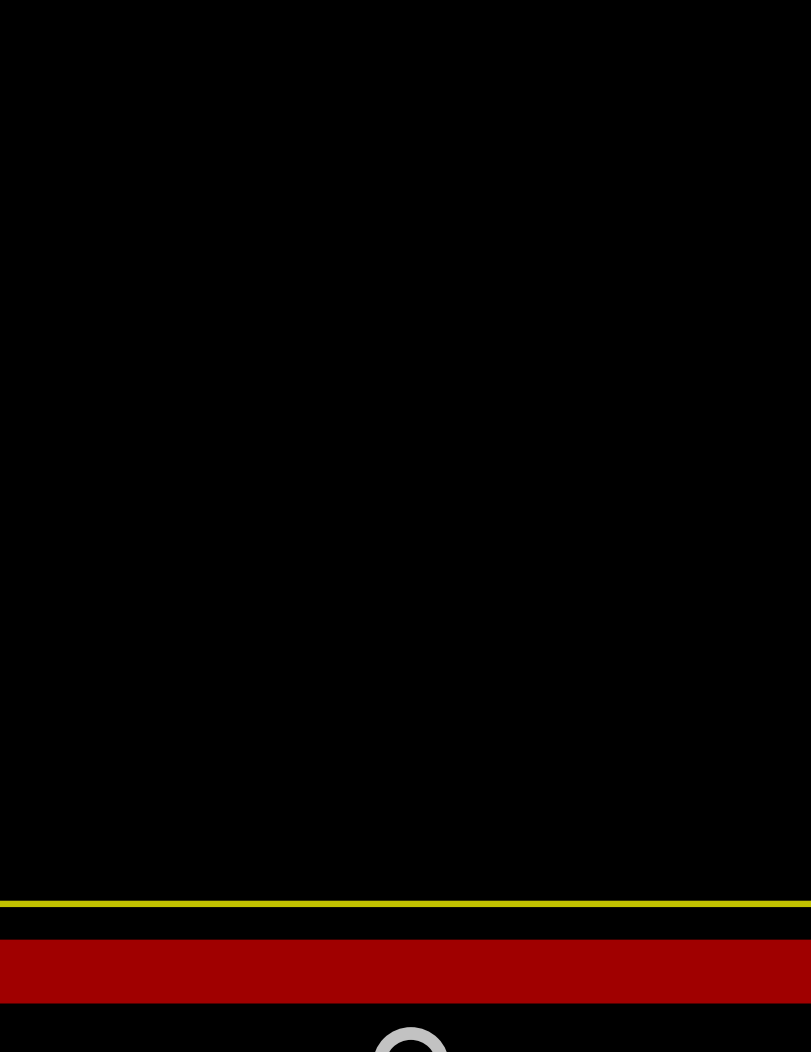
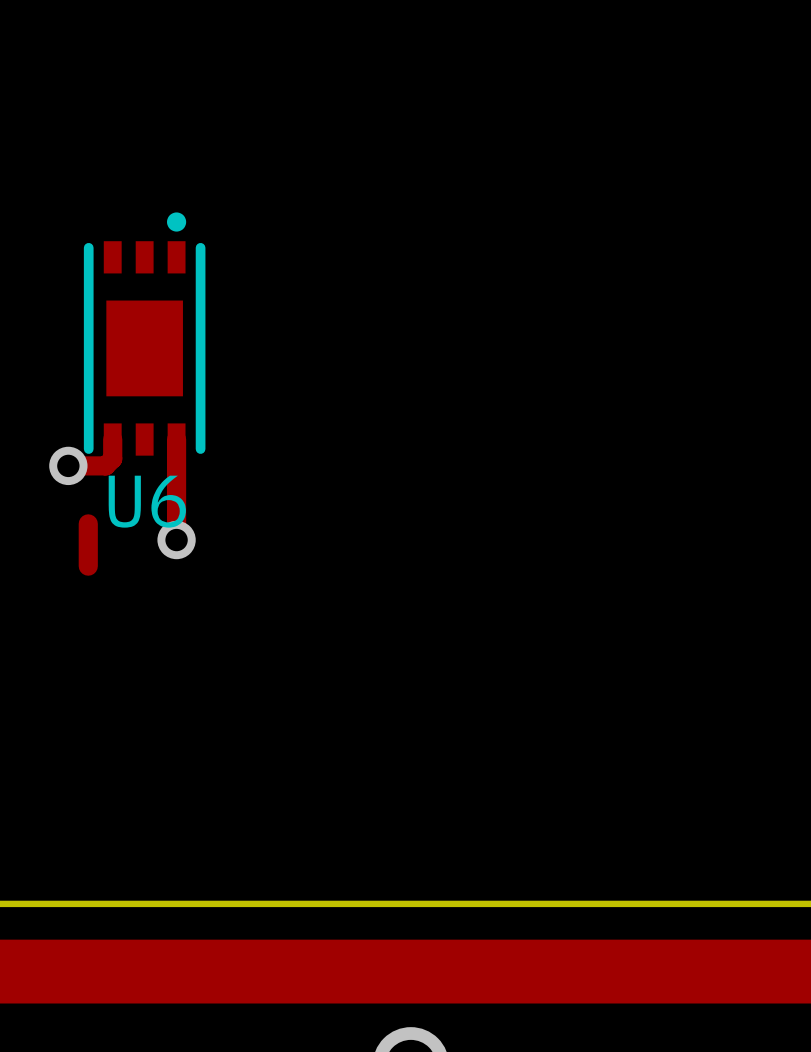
U6: none -> (144, 334)
track: none -> (112, 439) (112, 458) (105, 465) (68, 465)
track: none -> (176, 439) (176, 540)
via: none -> (68, 465)
track: none -> (88, 523) (88, 566)
via: none -> (176, 540)

